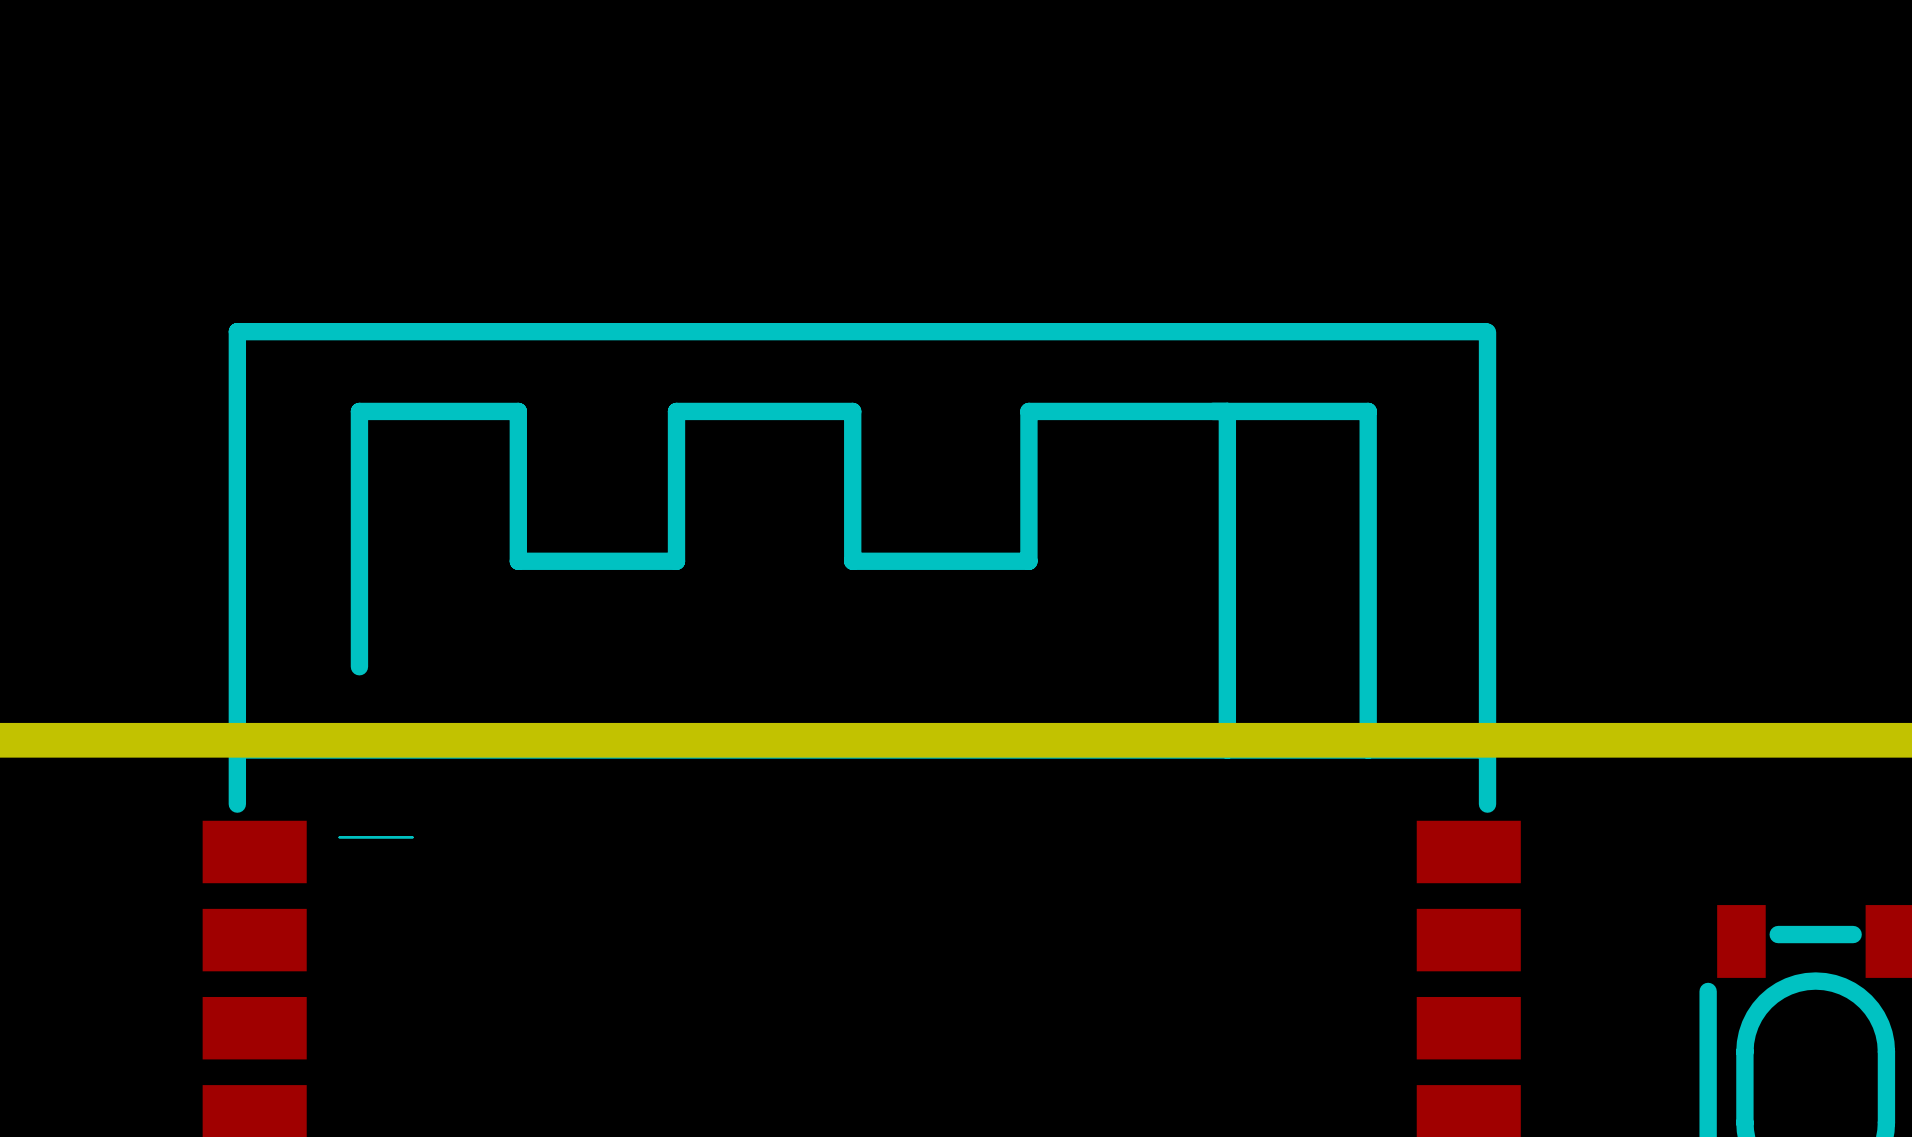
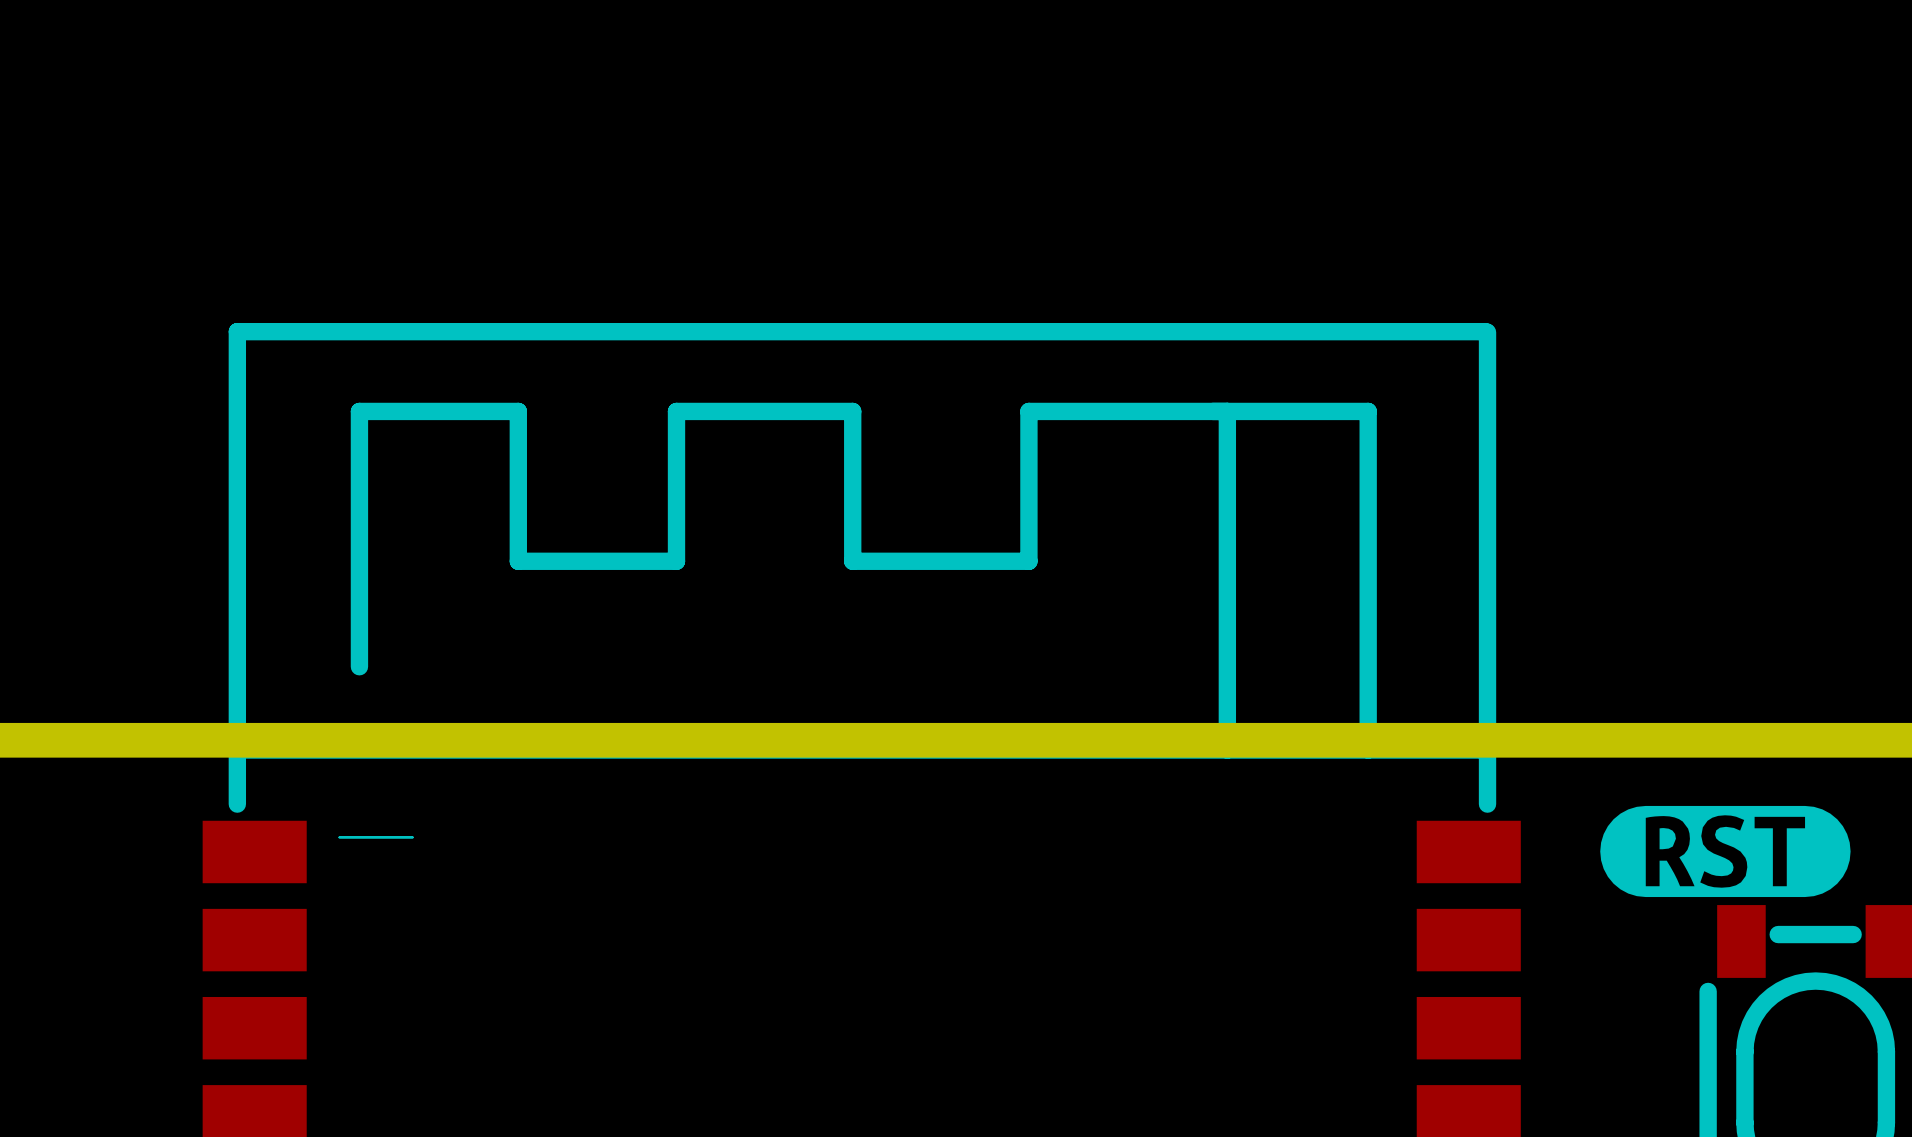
drawing: none -> [1600, 805, 1851, 898]

